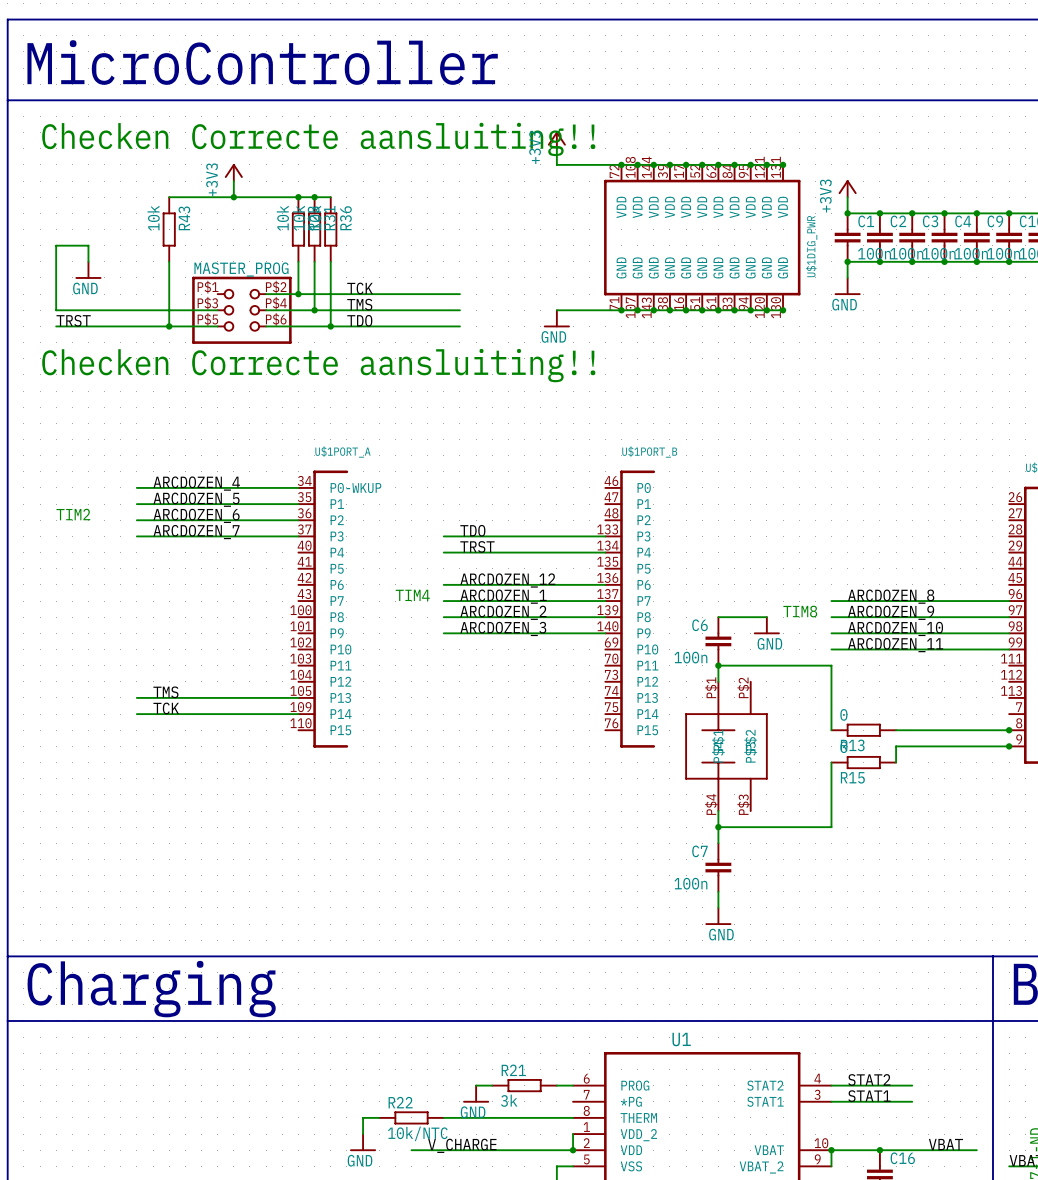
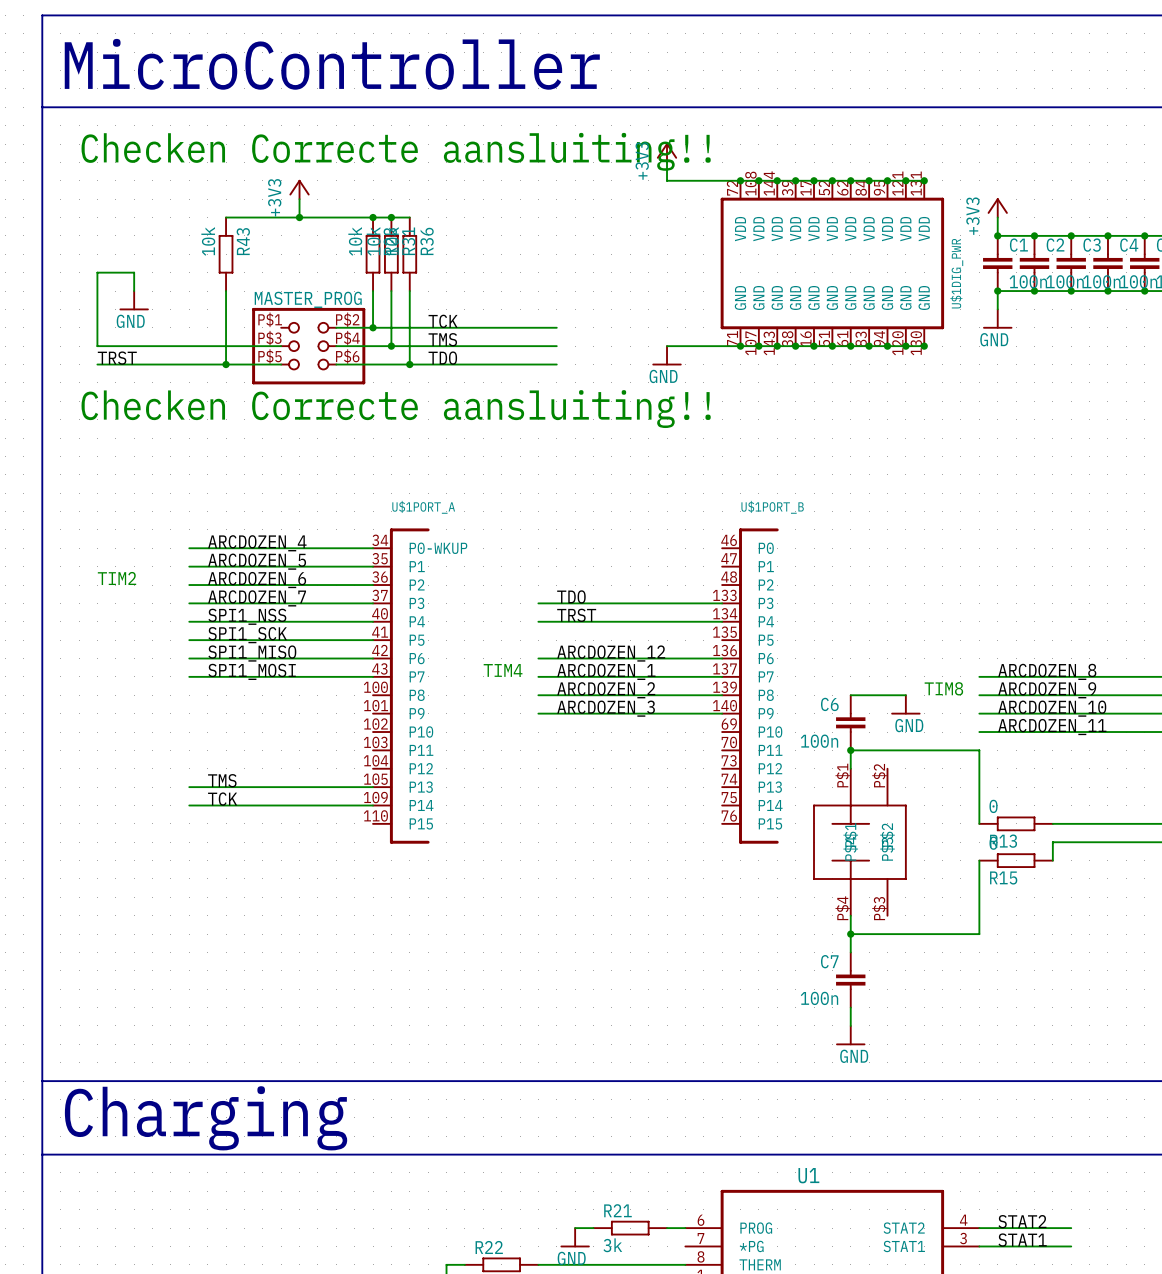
label: none -> SPI1_NSS (247, 616)
wire: none -> (189, 621) (373, 621)
label: none -> SPI1_SCK (247, 635)
wire: none -> (189, 640) (373, 640)
label: none -> SPI1_MISO (252, 653)
wire: none -> (189, 658) (373, 658)
label: none -> SPI1_MOSI (252, 671)
wire: none -> (189, 676) (373, 676)

